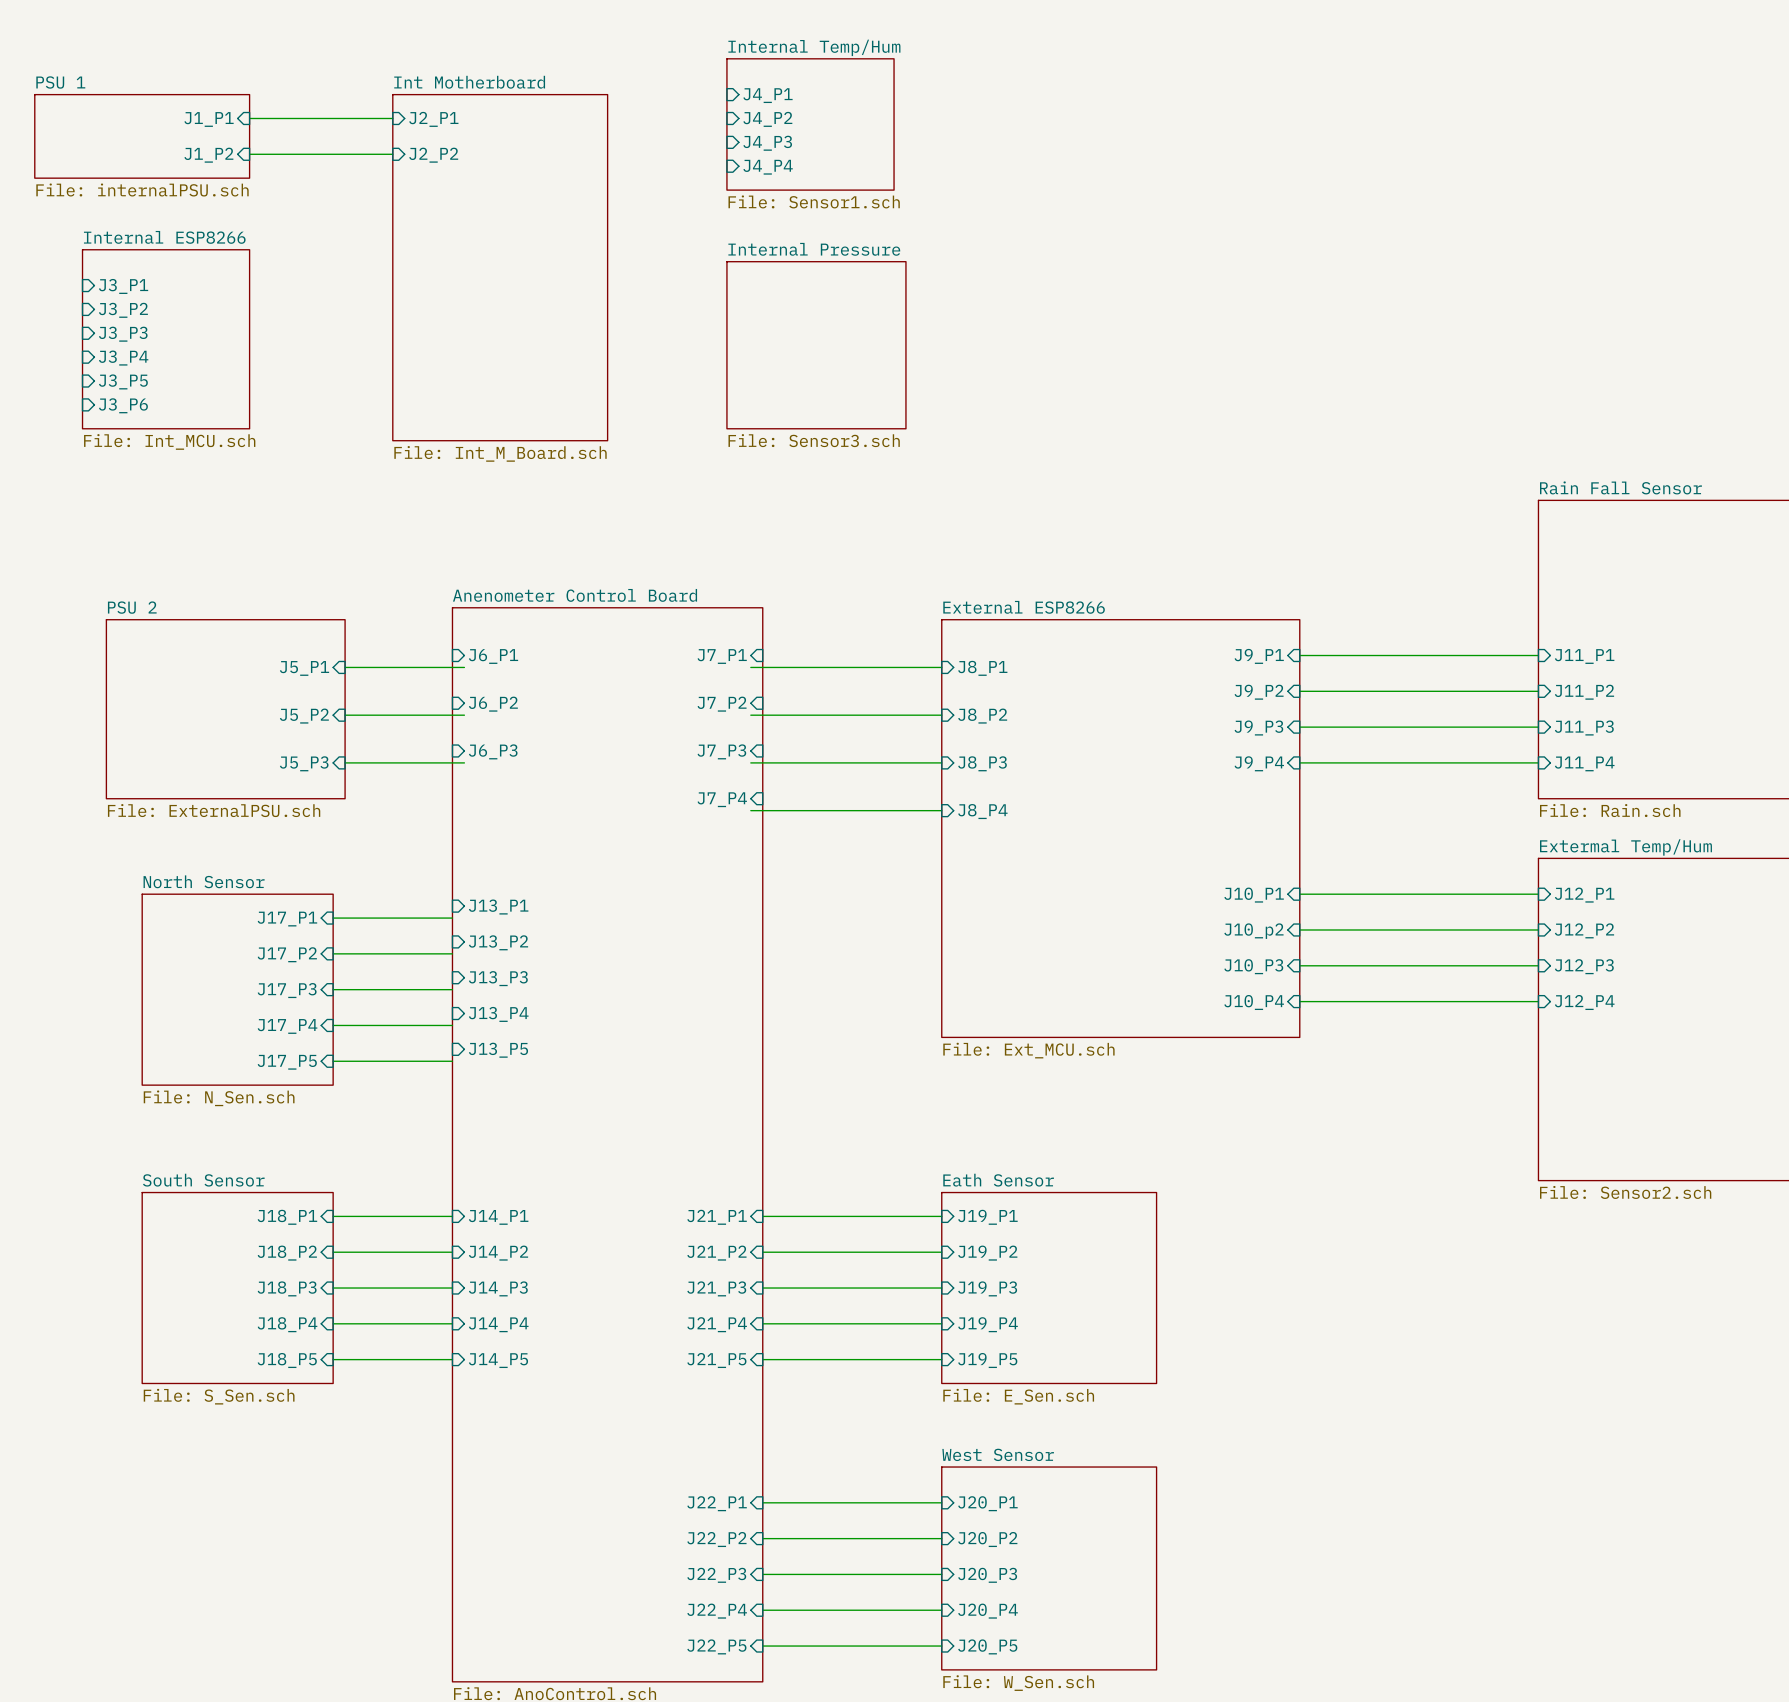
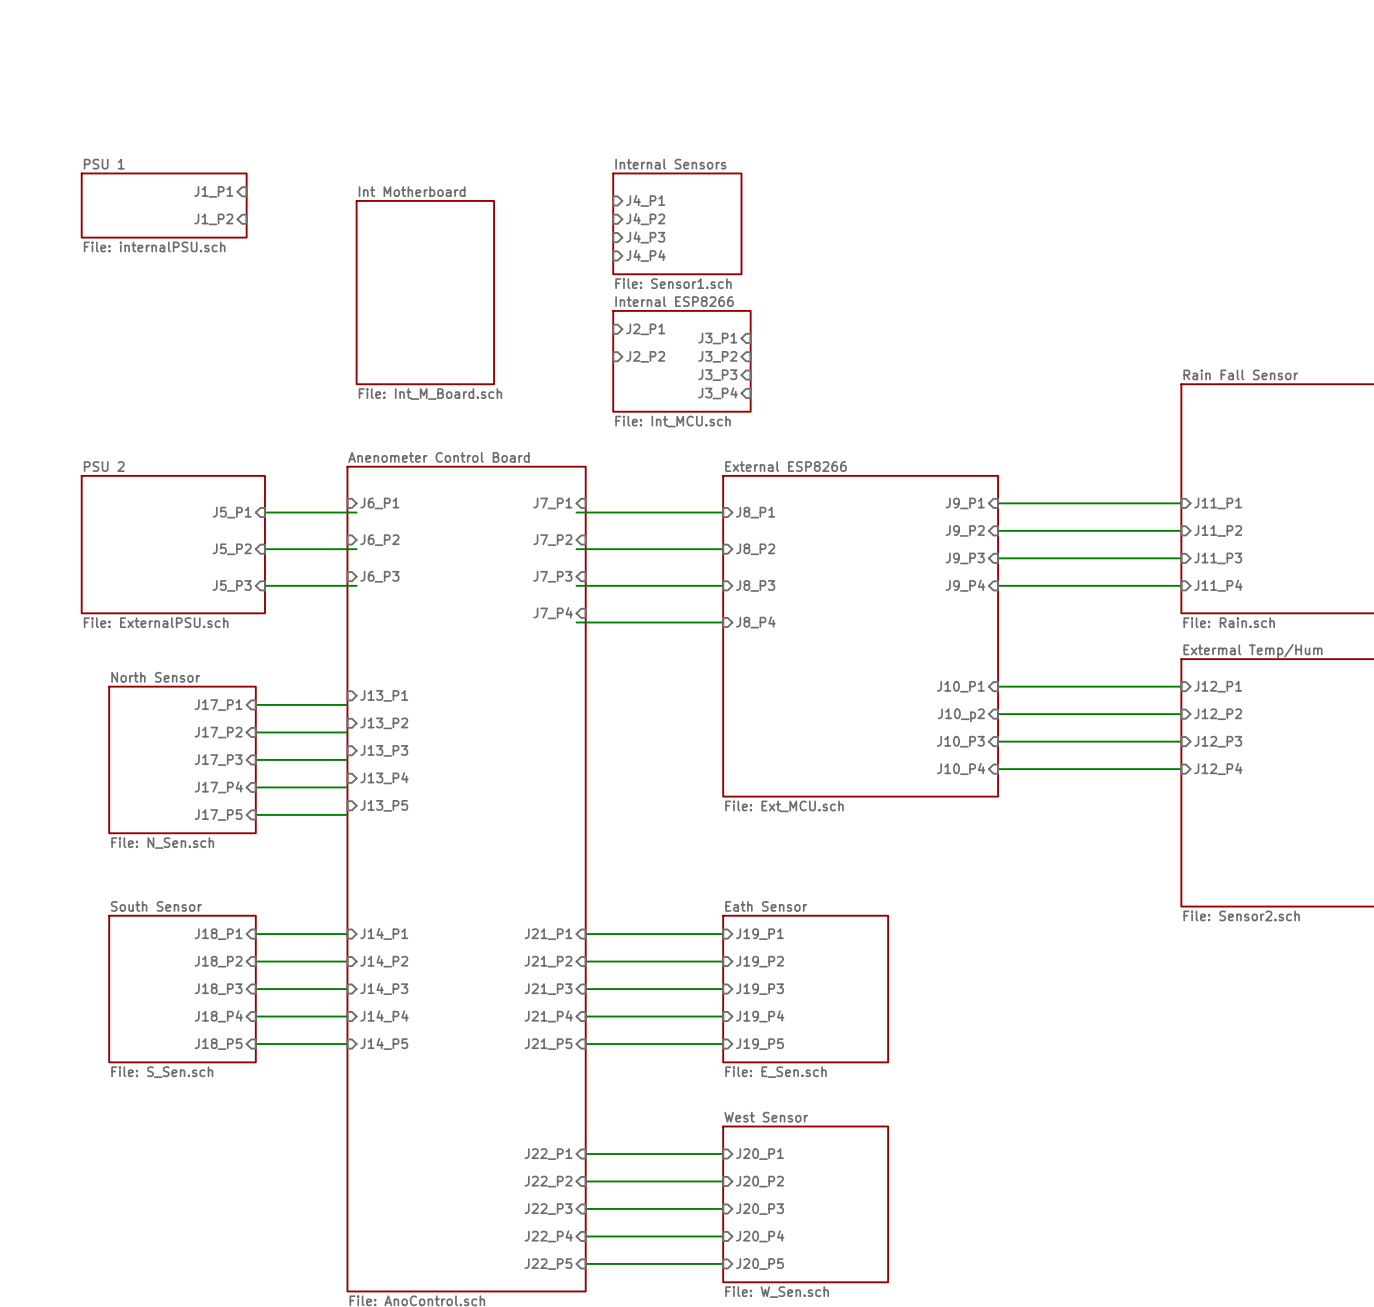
sheet pin position: J4_P1 (767, 95) -> J4_P1 (645, 200)
wire: (249, 118) (392, 118) -> none
sheet pin position: J1_P1 (209, 119) -> J1_P1 (213, 191)
sheet pin: J2_P1 (433, 119) -> none
sheet pin position: J4_P2 (767, 119) -> J4_P2 (645, 219)
sheet Internal Temp/Hum: File: Sensor1.sch (810, 124) -> none
sheet PSU 1 position: (142, 136) -> (164, 205)
sheet pin position: J4_P3 (767, 143) -> J4_P3 (645, 237)
wire: (249, 154) (392, 154) -> none
sheet pin position: J1_P2 (208, 155) -> J1_P2 (213, 219)
sheet pin: J2_P2 (433, 155) -> none
sheet pin position: J4_P4 (768, 167) -> J4_P4 (645, 255)
sheet Internal ESP8266 name position: Internal ESP8266 (164, 237) -> Internal ESP8266 (674, 301)
sheet Internal ESP8266 shape: [82, 249, 250, 429] -> [613, 310, 751, 412]
sheet Int Motherboard: File: Int_M_Board.sch (500, 267) -> none
sheet pin: J3_P1 (123, 286) -> none
sheet Internal Sensors: none -> File: Sensor1.sch (677, 223)
sheet pin: J3_P2 (123, 310) -> none
sheet pin: J3_P3 (123, 334) -> none
sheet Internal Pressure: File: Sensor3.sch (816, 345) -> none
sheet pin: J3_P4 (123, 358) -> none
sheet pin: J3_P5 (123, 381) -> none
sheet Int Motherboard: none -> File: Int_M_Board.sch (425, 292)
sheet pin: J3_P6 (123, 405) -> none
sheet pin: none -> J2_P1 (645, 329)
sheet Internal ESP8266 value position: File: Int_MCU.sch (169, 441) -> File: Int_MCU.sch (673, 421)
sheet pin: none -> J3_P1 (717, 338)
sheet pin: none -> J2_P2 (645, 356)
sheet pin: none -> J3_P2 (717, 356)
sheet pin: none -> J3_P3 (717, 375)
sheet pin: none -> J3_P4 (718, 393)

